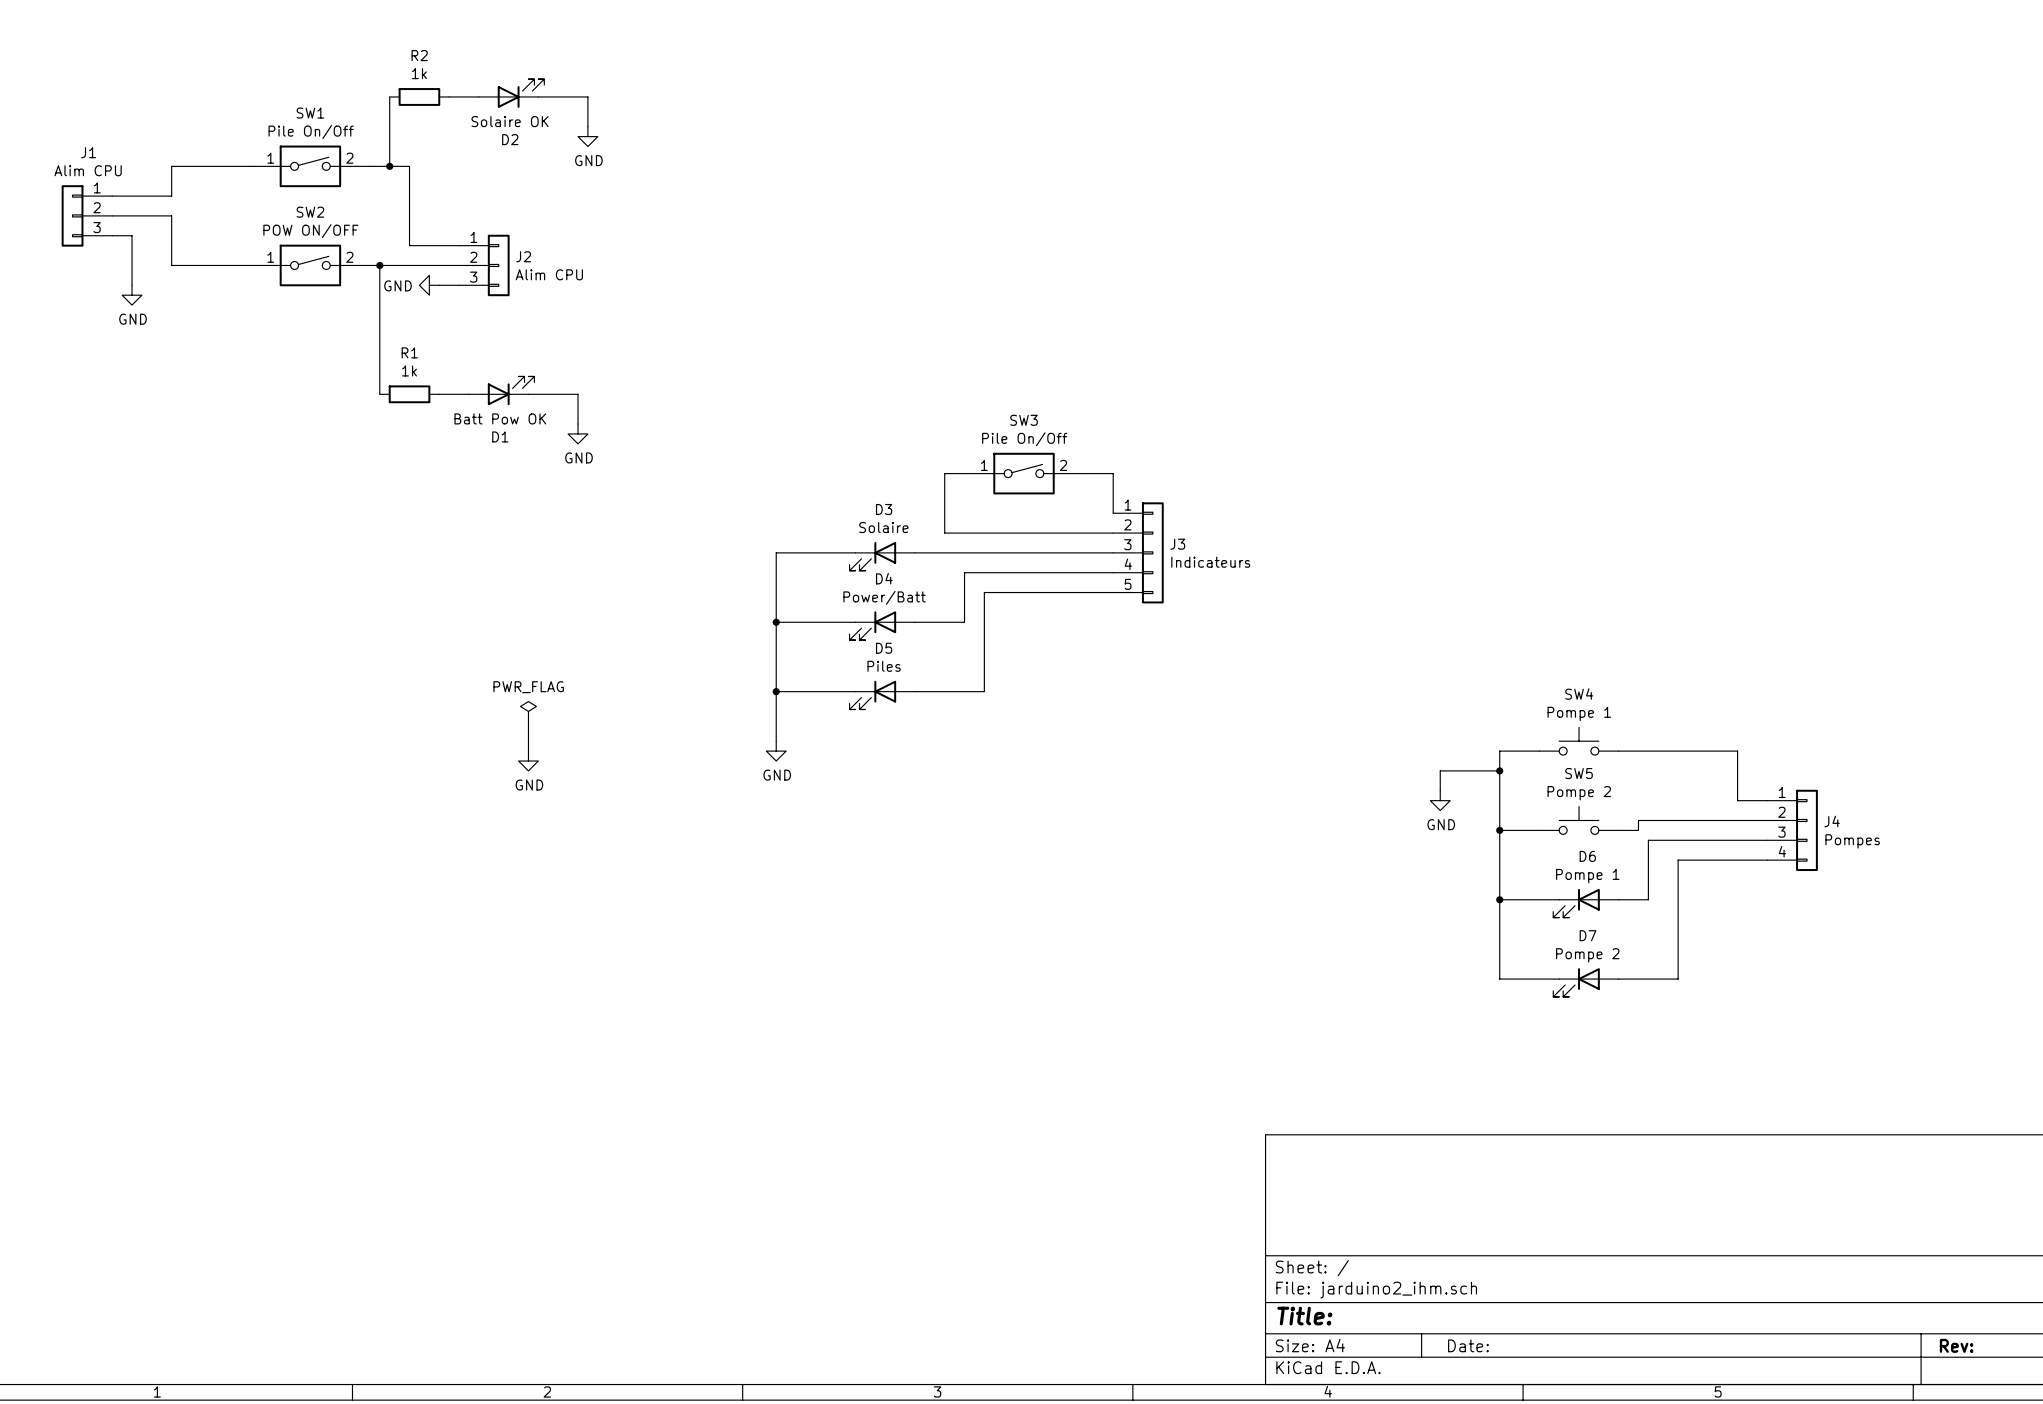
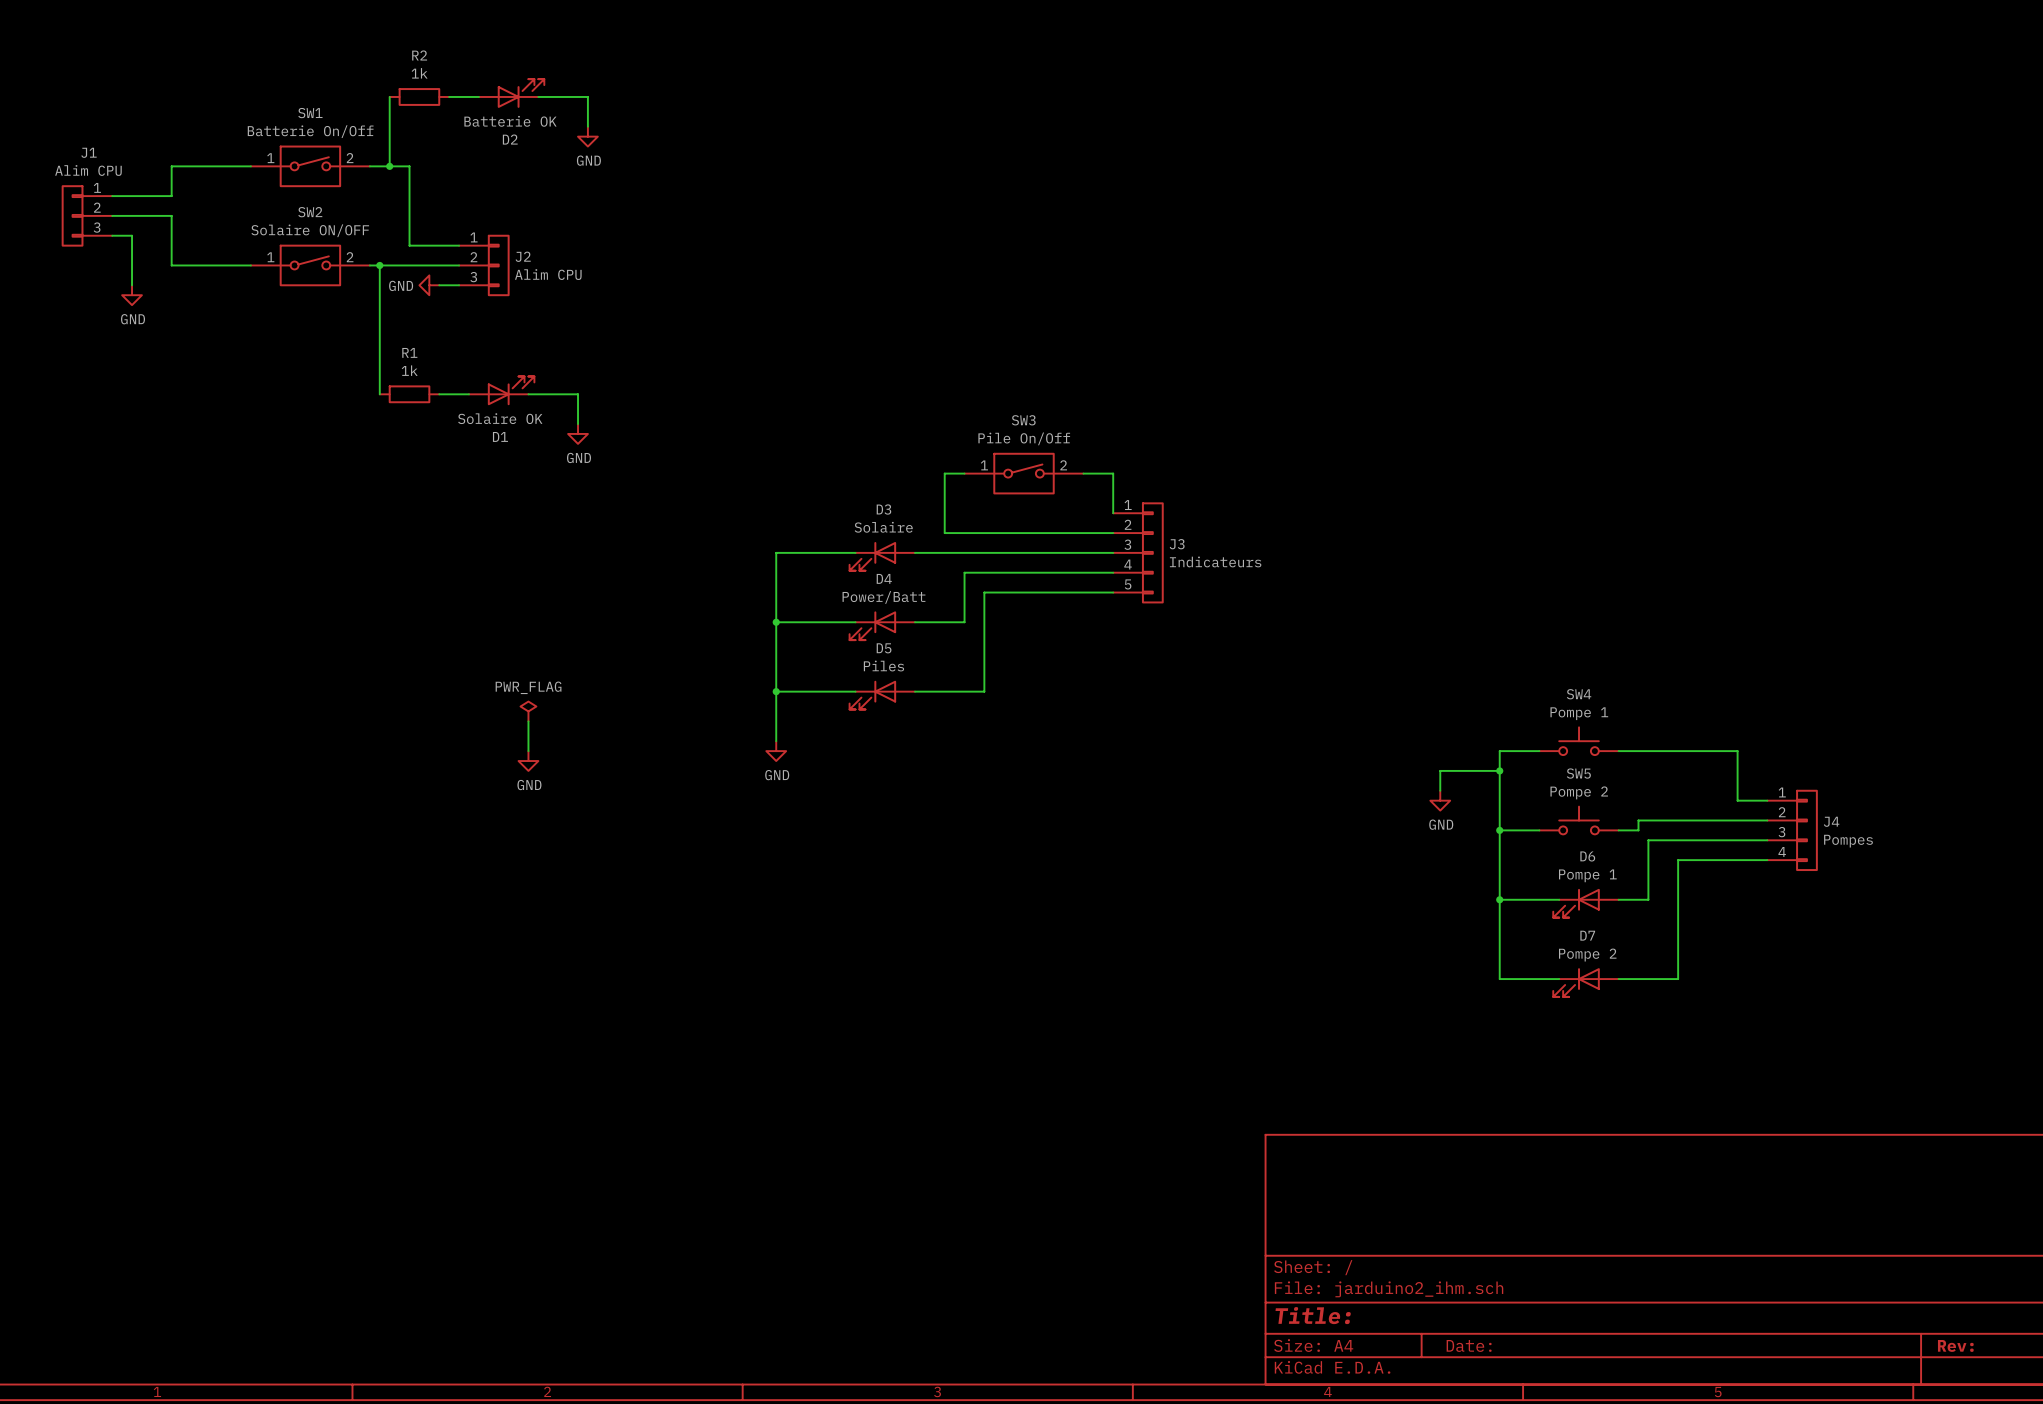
D2 value: Solaire OK (510, 121) -> Batterie OK (510, 121)
SW1 value: Pile On/Off (311, 132) -> Batterie On/Off (310, 131)
SW2 value: POW ON/OFF (310, 231) -> Solaire ON/OFF (310, 230)
D1 value: Batt Pow OK (500, 418) -> Solaire OK (500, 418)

